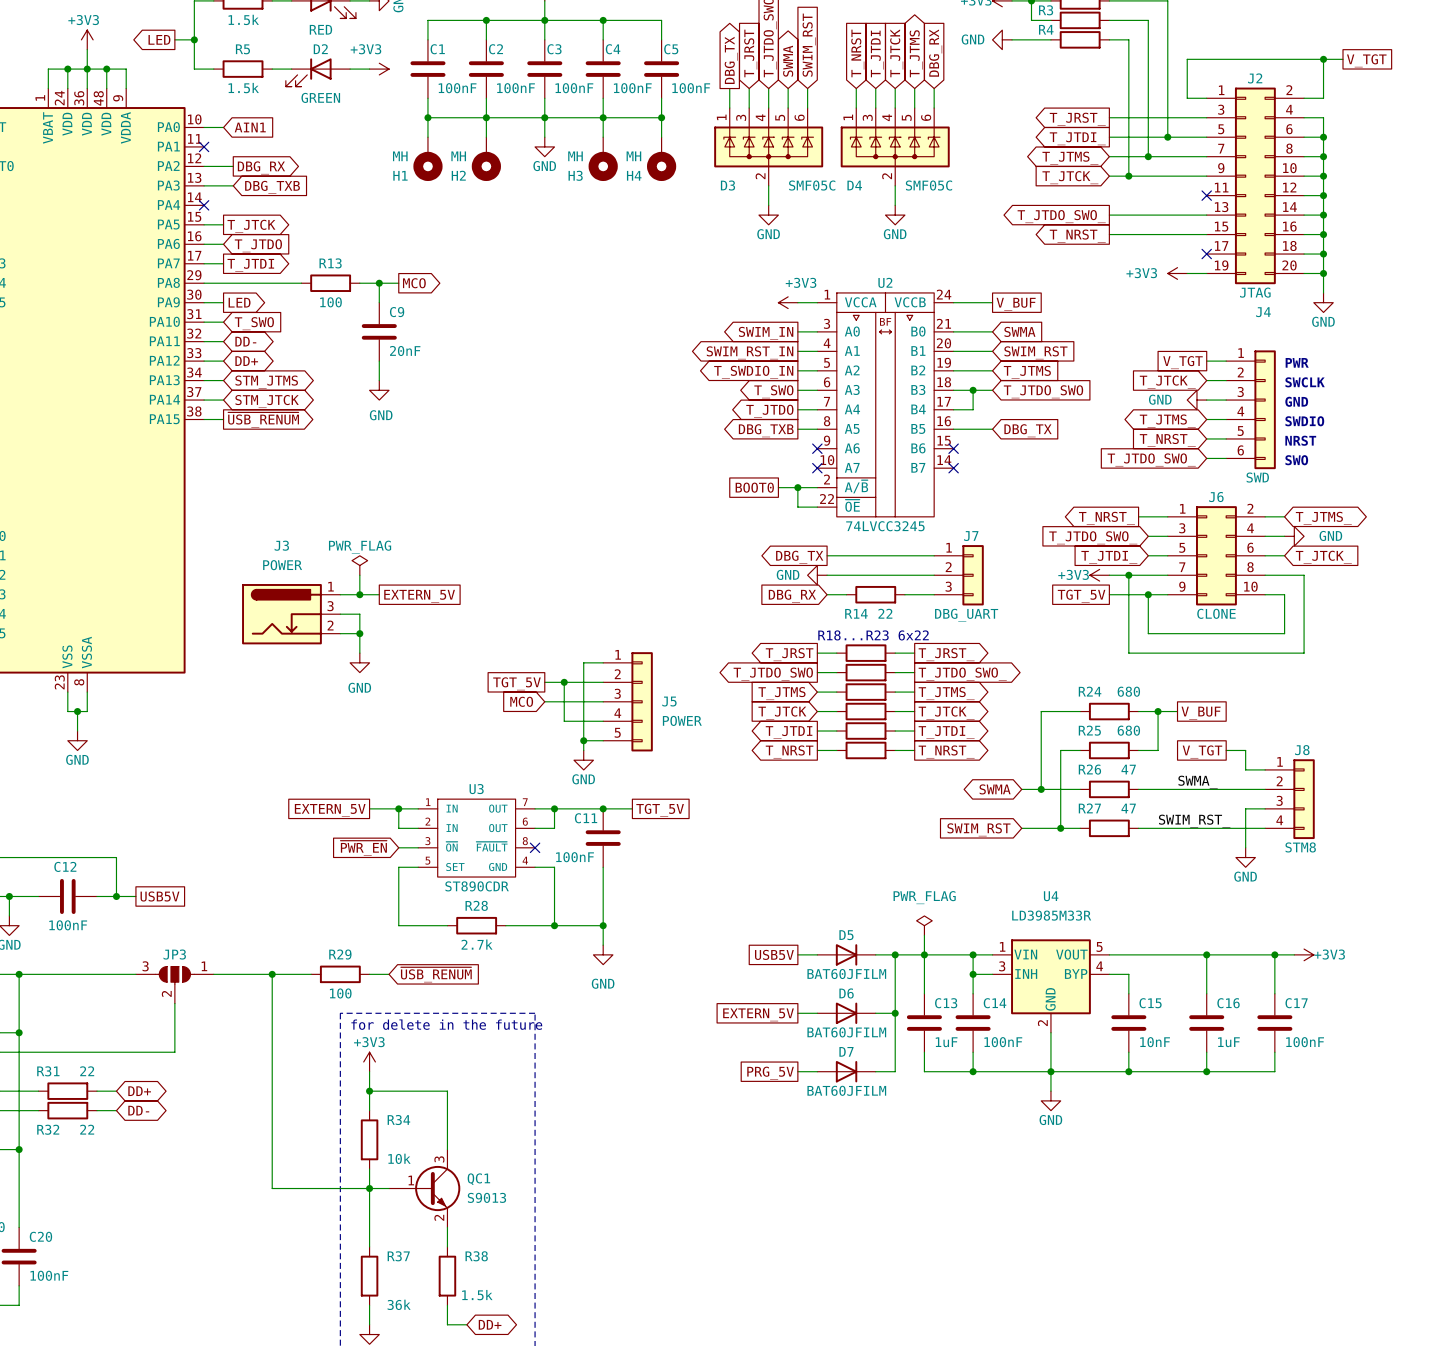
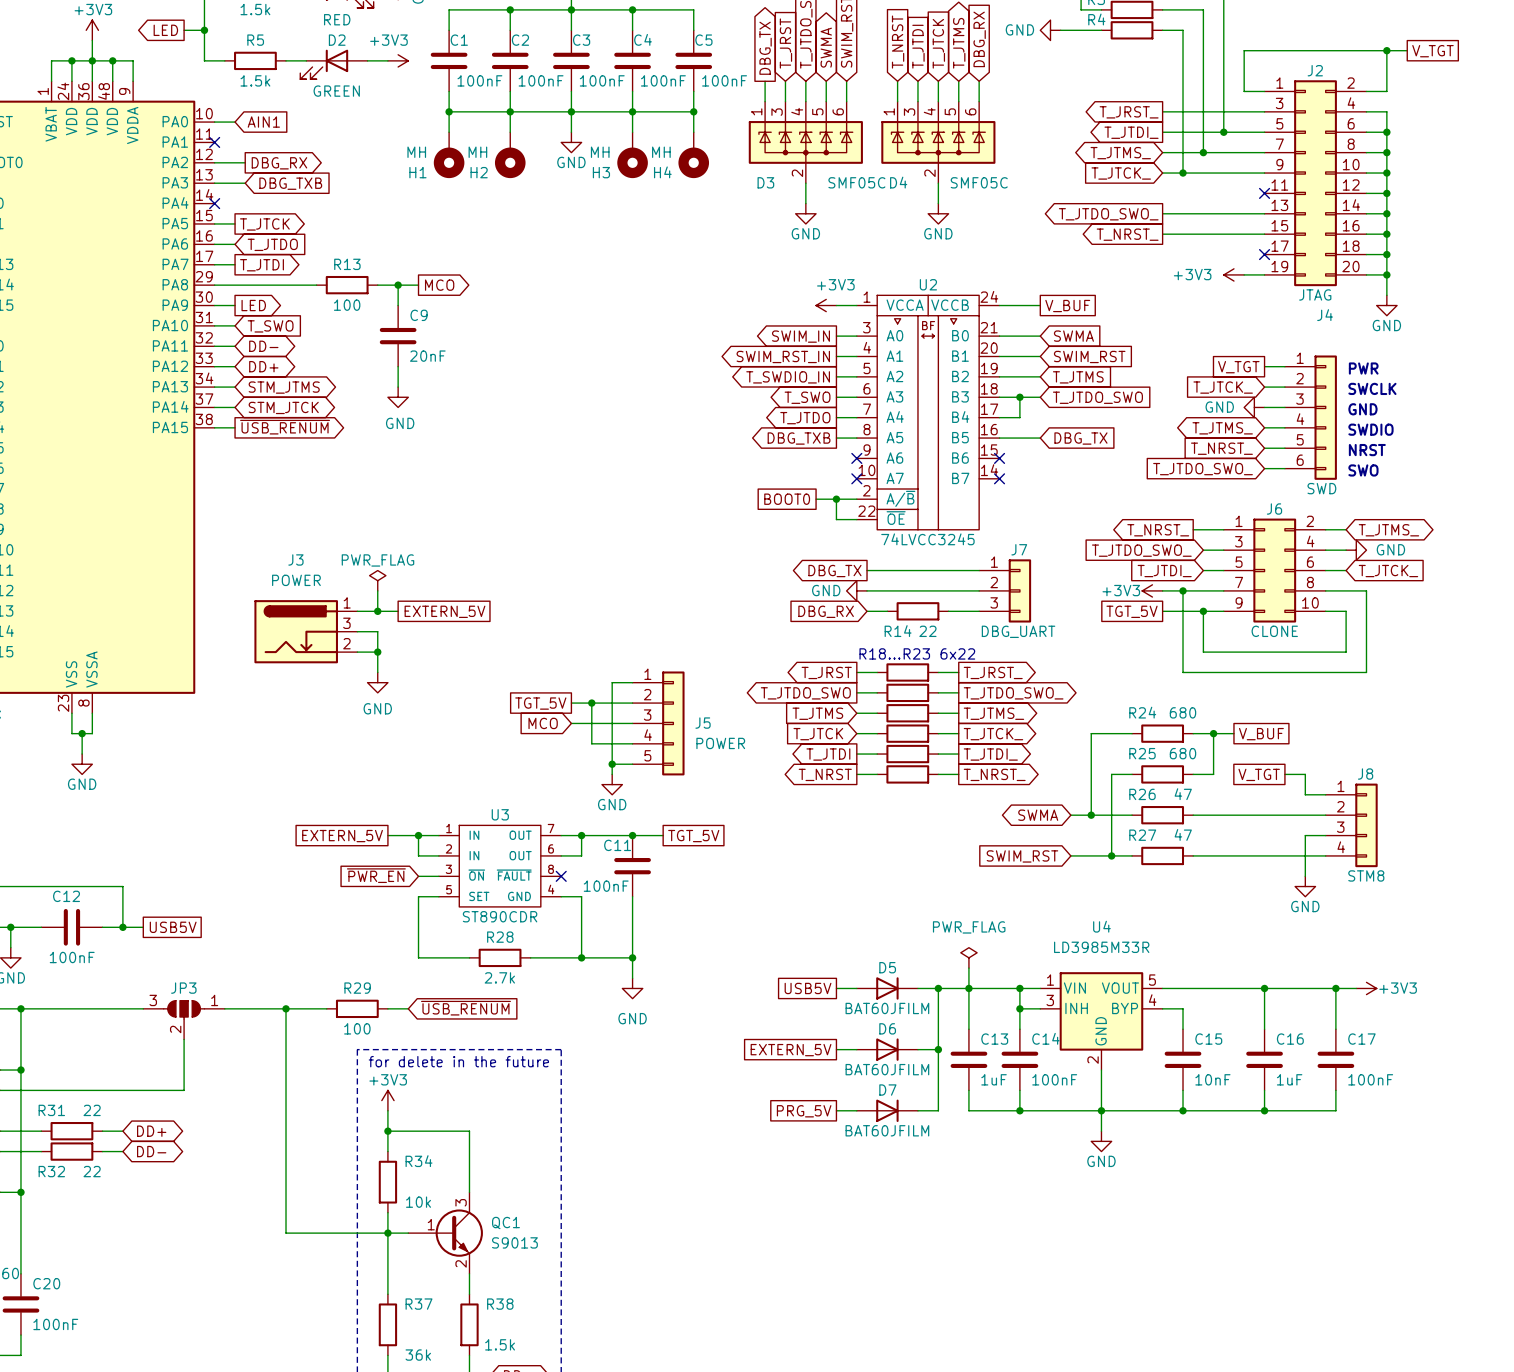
label: SWMA_ (1198, 782) -> none
label: SWIM_RST_ (1194, 821) -> none

